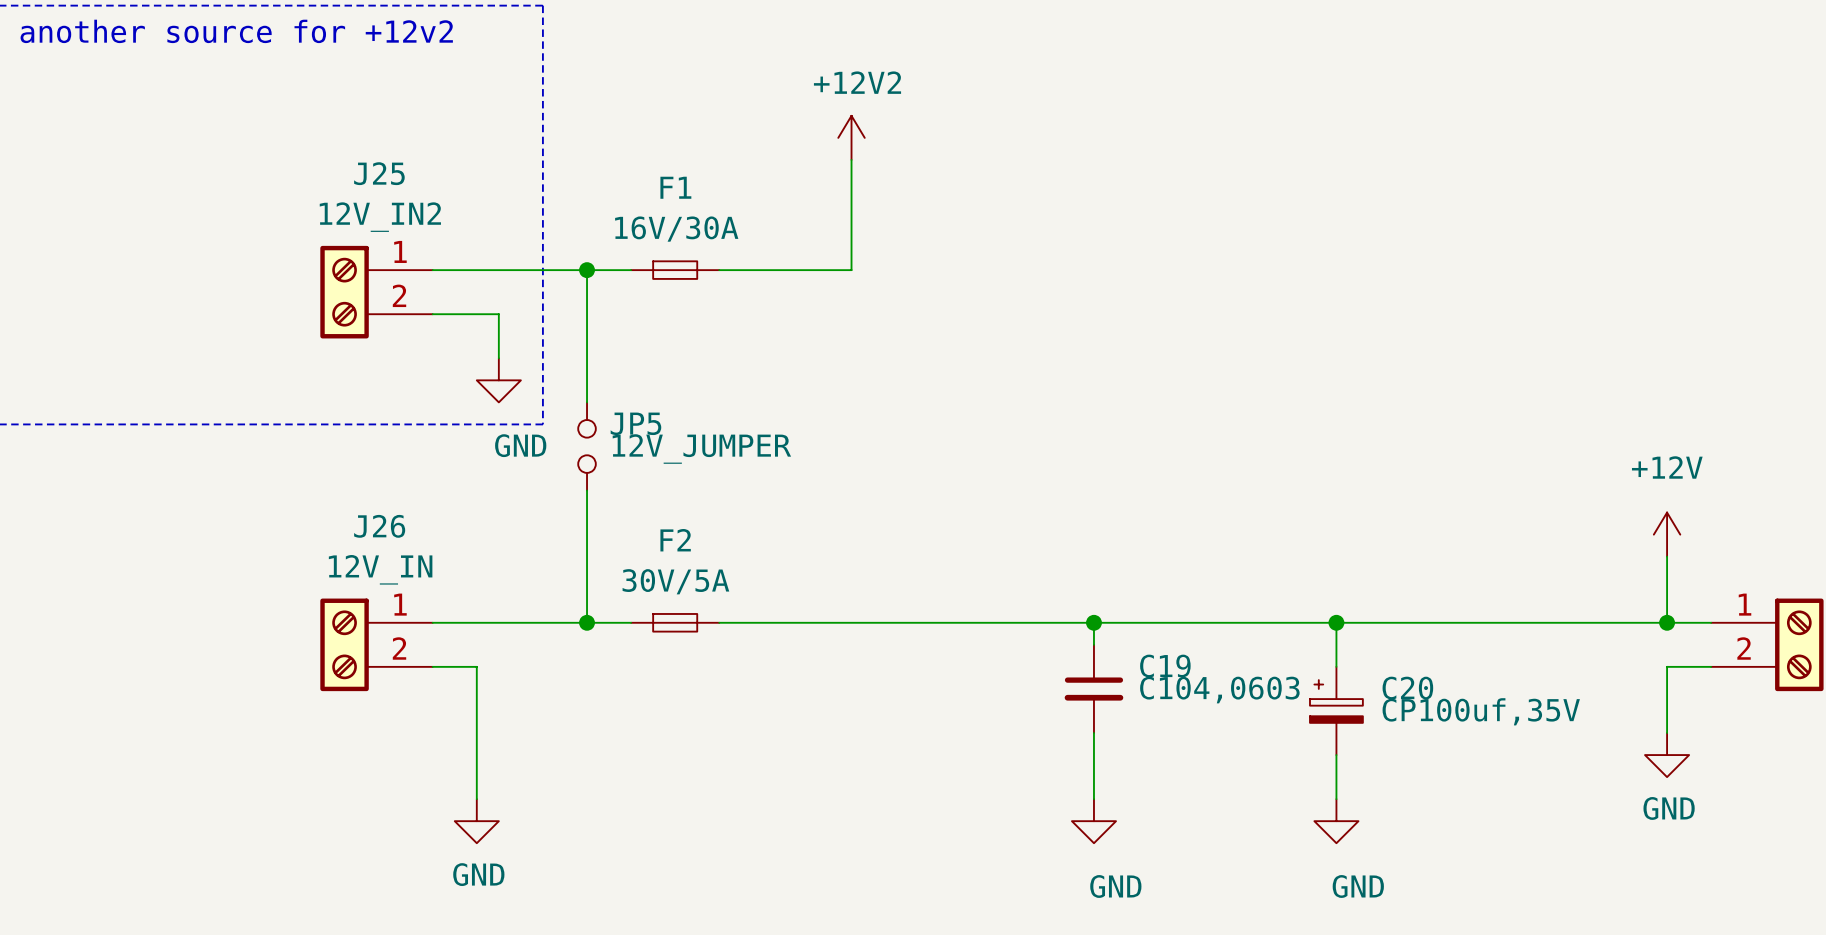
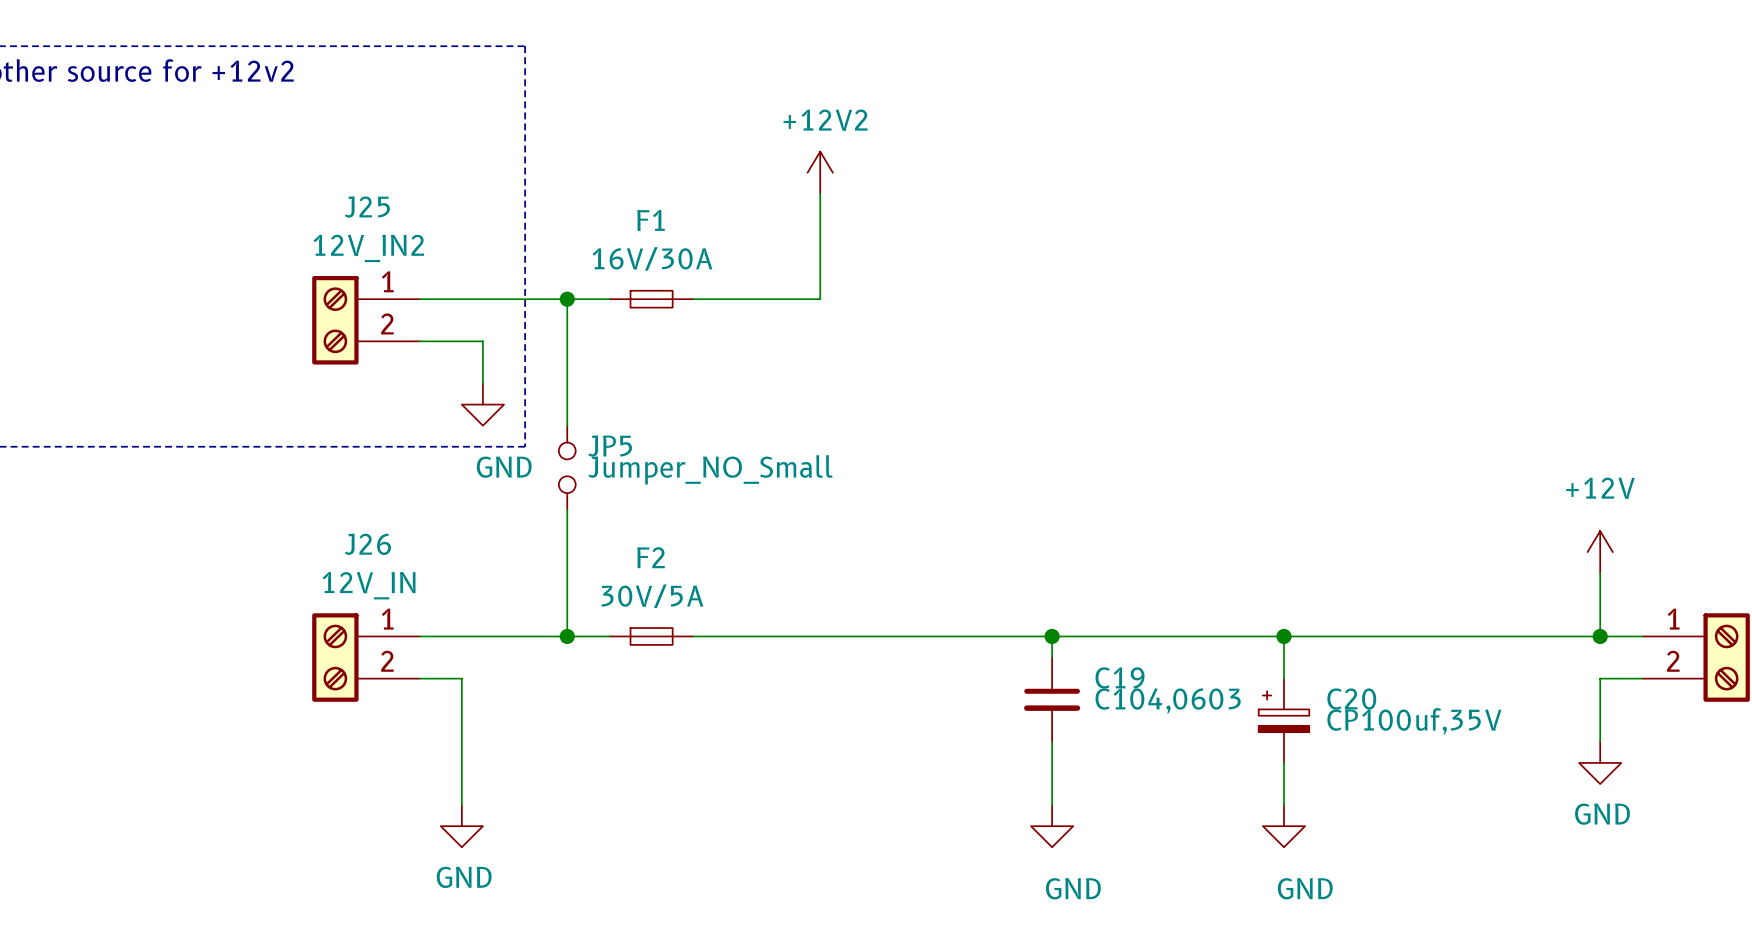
JP5 value: 12V_JUMPER (701, 449) -> Jumper_NO_Small (710, 469)

